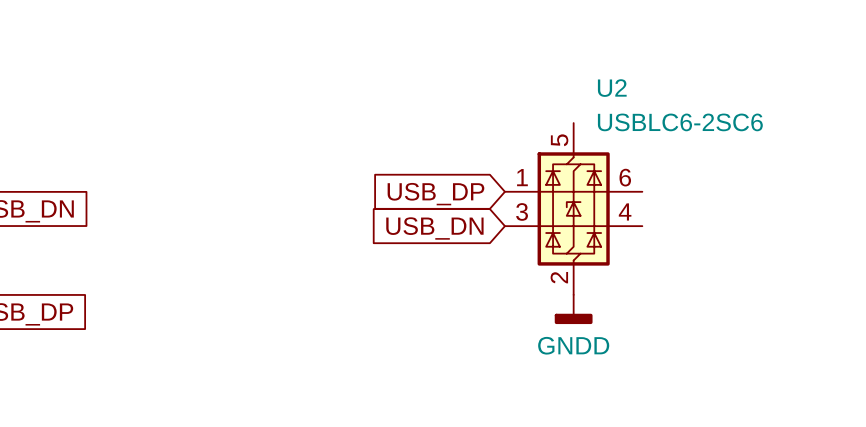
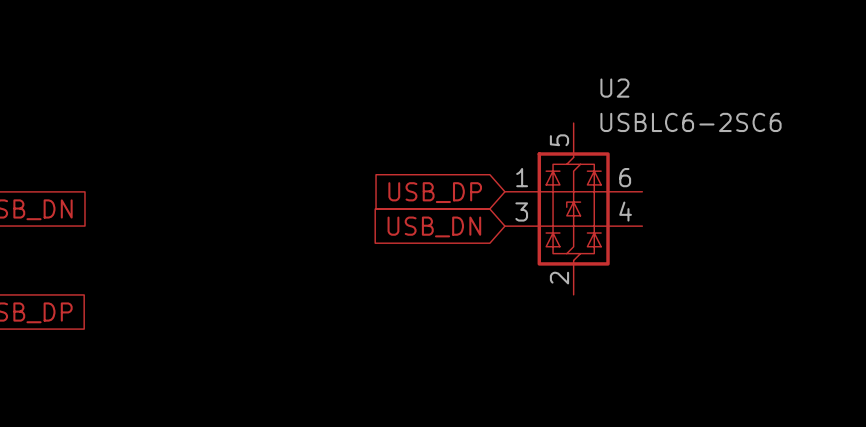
power symbol: GNDD (573, 309) -> none

